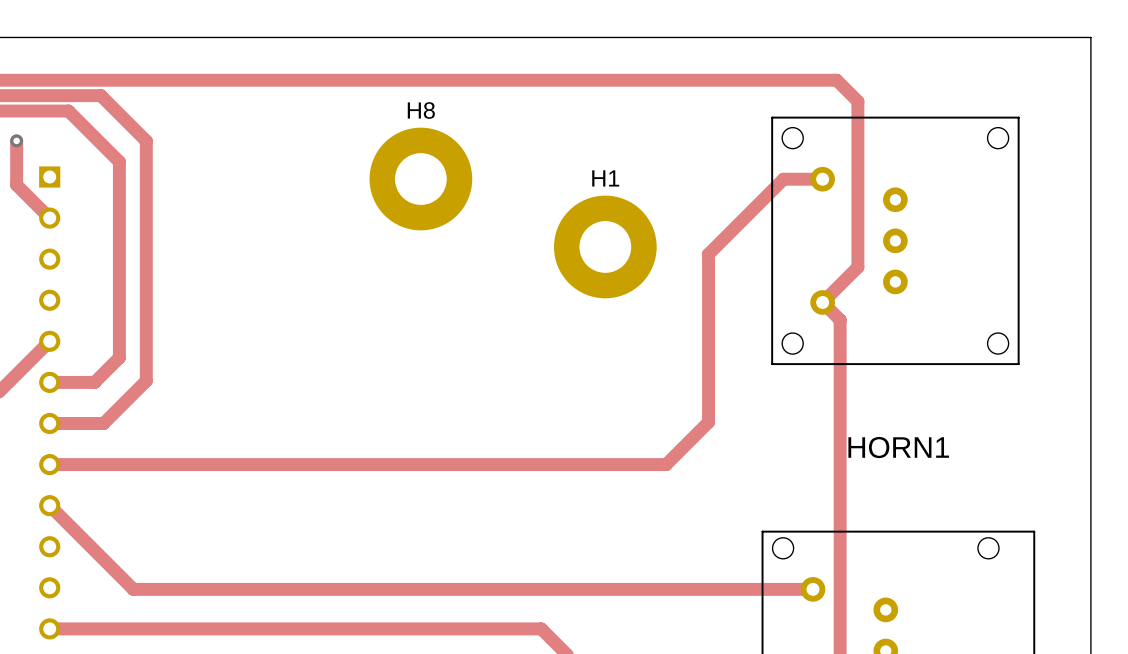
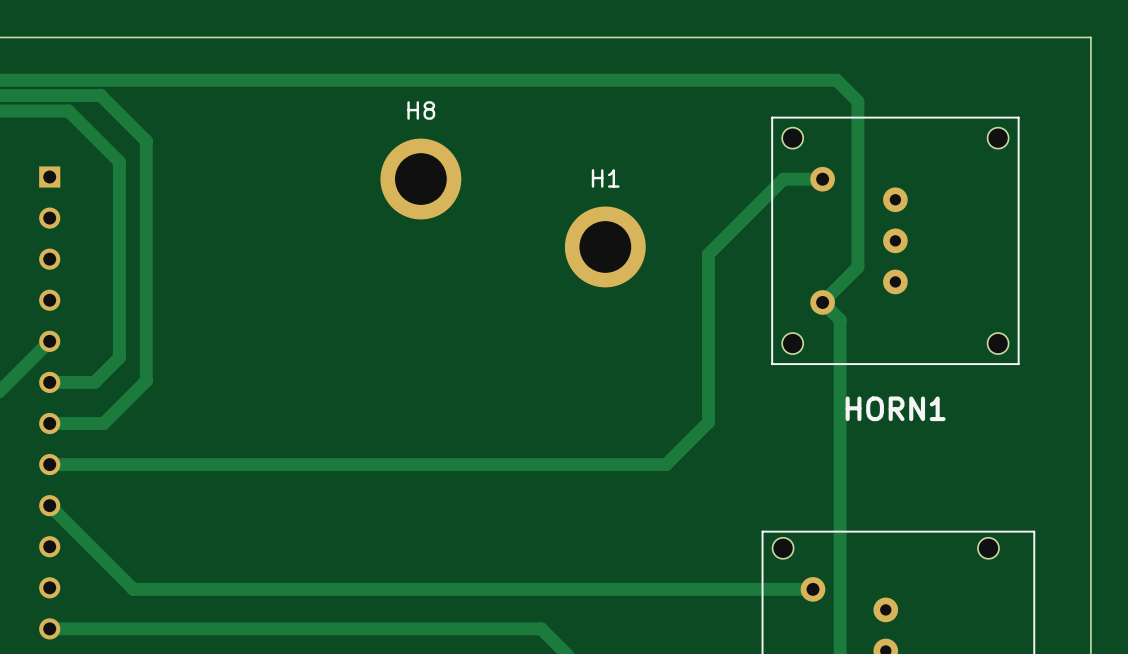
H8 footprint: [369, 127, 473, 231] -> [380, 138, 462, 220]
track: (16, 140) (16, 185) (49, 218) -> none
via: (16, 140) -> none
H1 footprint: [553, 195, 657, 299] -> [564, 206, 646, 288]
HORN1 name position: HORN1 (898, 447) -> HORN1 (895, 408)

